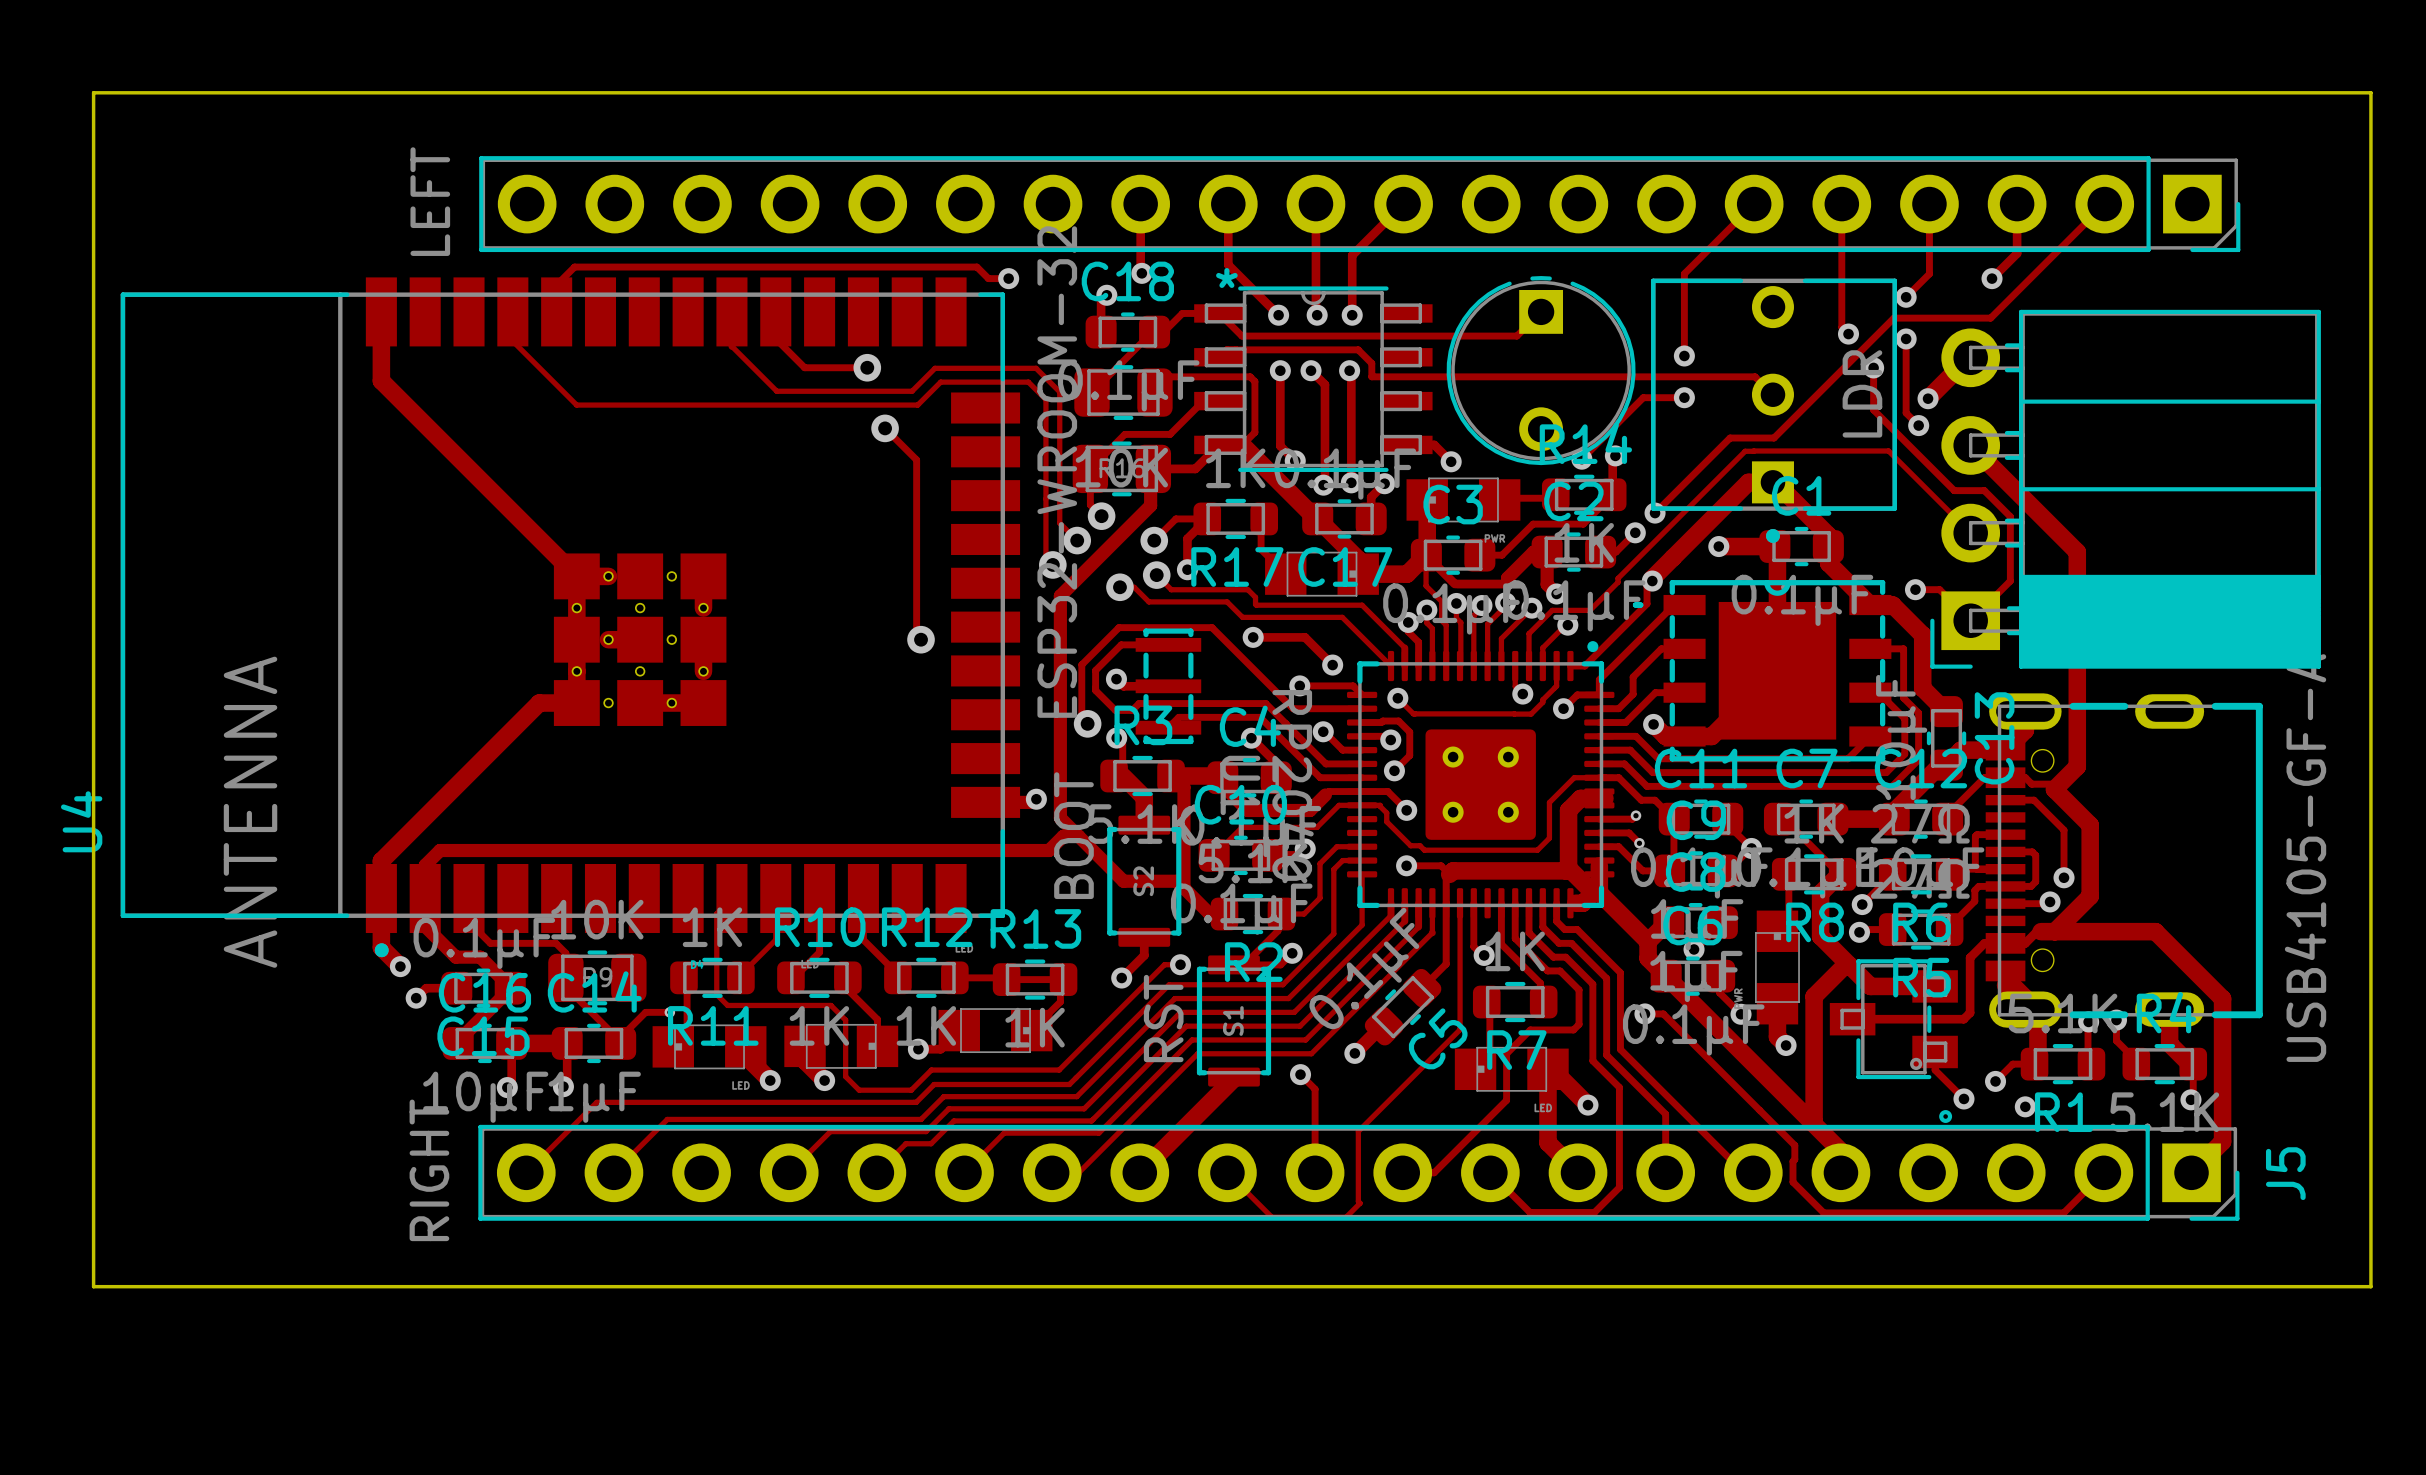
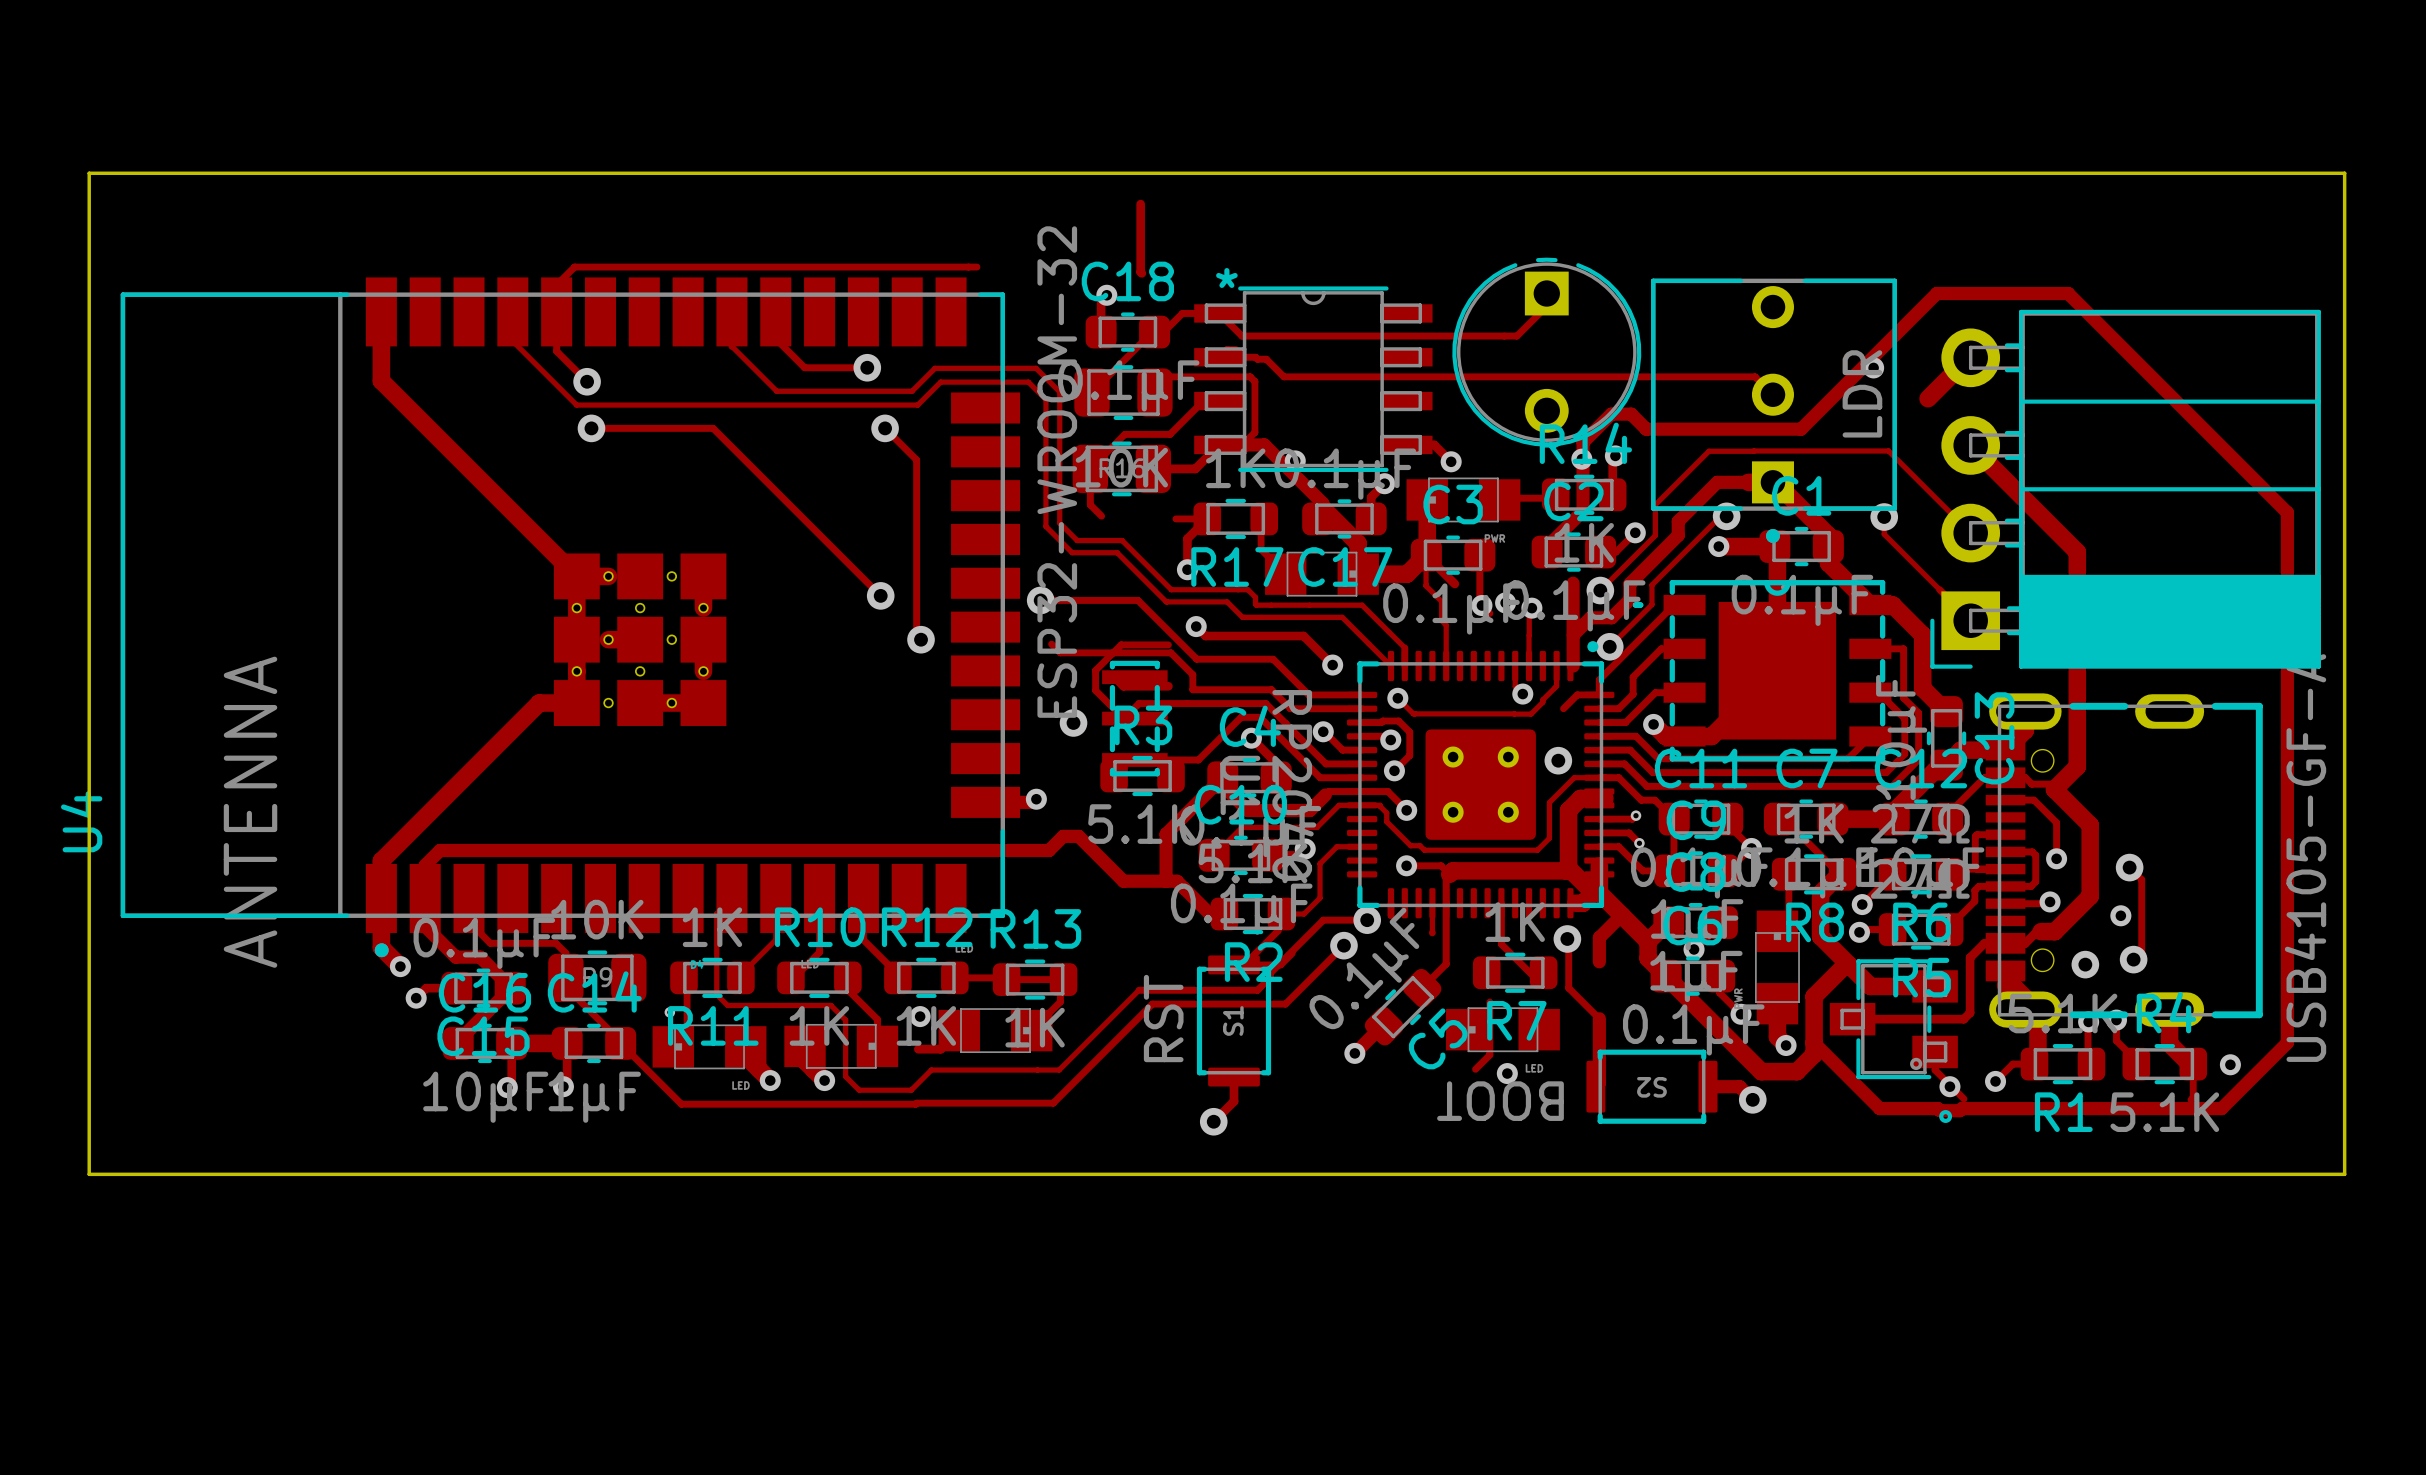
board edge: (93, 92) (93, 1286) (2370, 1286) (2370, 92) (93, 92) -> (89, 173) (89, 1174) (2344, 1174) (2344, 173) (89, 173)
track: (1228, 204) (1228, 264) (1278, 315) -> none
track: (1315, 204) (1317, 315) -> none
part: LEFT (1359, 204) -> none
track: (1403, 204) (1352, 255) (1352, 315) -> none
track: (1754, 204) (1684, 273) (1684, 355) -> none
track: (1841, 204) (1841, 327) (1848, 334) -> none
track: (1929, 204) (1929, 273) (1906, 297) -> none
track: (2017, 204) (2017, 253) (1992, 278) -> none
track: (2104, 204) (1990, 318) (1893, 318) (1774, 438) (1730, 438) (1655, 513) -> none
track: (976, 267) (988, 278) (1008, 278) -> none
via: (1141, 273) -> none
via: (1008, 278) -> none
via: (1992, 278) -> none
via: (1906, 297) -> none
track: none -> (556, 311) (556, 351) (587, 381)
via: (1278, 315) -> none
via: (1317, 315) -> none
via: (1352, 315) -> none
via: (1848, 334) -> none
track: (1906, 338) (1906, 413) (1918, 425) -> none
via: (1906, 338) -> none
track: (1236, 349) (1358, 349) (1371, 363) (1371, 376) -> (1219, 357) (1255, 357) (1257, 359) (1266, 359) (1283, 376) (1371, 376)
via: (1684, 355) -> none
track: (1873, 367) (1873, 409) (1954, 490) (1984, 490) (2010, 516) (2010, 581) (1970, 620) -> (1884, 517) (1884, 534) (1970, 620)
track: (1280, 370) (1280, 446) (1295, 460) -> none
via: (1280, 370) -> none
track: (1311, 370) (1324, 384) (1323, 485) -> none
via: (1311, 370) -> none
track: (1349, 370) (1351, 372) (1351, 482) -> none
via: (1349, 370) -> none
part position: (1541, 370) -> (1546, 352)
via: none -> (587, 381)
track: (1684, 397) (1643, 397) (1581, 459) -> none
via: (1684, 397) -> none
via: (1928, 398) -> none
via: (1918, 425) -> none
track: none -> (591, 428) (713, 428) (880, 595)
via: none -> (591, 428)
track: (1242, 444) (1358, 559) -> (1219, 444) (1264, 444) (1322, 503) (1322, 508) (1358, 543) (1358, 559)
track: (1745, 451) (1618, 578) (1618, 582) (1589, 610) (1552, 610) (1529, 635) -> (1745, 451) (1708, 451) (1655, 504) (1655, 535) (1600, 590)
track: (1150, 471) (1150, 505) (1060, 595) (1060, 818) (1078, 836) -> none
via: (1351, 482) -> none
track: (1748, 482) (1652, 578) (1647, 586) (1647, 603) (1584, 666) (1570, 666) -> (1748, 482) (1717, 482) (1678, 521) (1678, 535) (1629, 583) (1629, 599) (1611, 617) (1590, 617) (1573, 635)
via: (1323, 485) -> none
track: (1612, 486) (1612, 494) (1583, 524) (1533, 524) (1502, 555) (1479, 555) -> none
via: (1655, 513) -> none
via: (1101, 516) -> none
track: none -> (1726, 516) (1720, 516) (1651, 585) (1651, 604) (1609, 646)
via: none -> (1726, 516)
via: none -> (1884, 517)
track: (1175, 518) (1154, 540) -> none
track: (1045, 526) (1045, 558) (1052, 564) -> none
track: none -> (1077, 540) (1122, 540) (1156, 575)
via: (1077, 540) -> none
via: (1154, 540) -> none
track: none -> (1541, 552) (1583, 510) (1583, 442) (1611, 414) (1631, 414) (1646, 429) (1801, 429) (1936, 293) (2068, 293) (2287, 512) (2287, 1042) (2221, 1108) (1961, 1108) (1959, 1110) (1940, 1110) (1937, 1108) (1879, 1108) (1814, 1042)
via: (1052, 564) -> none
track: none -> (1479, 565) (1479, 603) (1489, 613)
via: (1156, 575) -> none
track: (1507, 578) (1533, 552) (1547, 552) (1547, 584) (1556, 593) -> none
via: (1652, 581) -> none
track: none -> (1573, 583) (1573, 666)
track: (1457, 584) (1507, 584) -> none
track: (1119, 587) (1134, 587) (1148, 601) (1166, 601) -> (1045, 526) (1072, 552) (1117, 552) (1166, 601)
via: (1119, 587) -> none
track: (1915, 589) (1939, 589) -> none
via: (1915, 589) -> none
via: none -> (1600, 590)
via: (1556, 593) -> none
via: none -> (880, 595)
via: none -> (1040, 600)
track: (1505, 602) (1505, 606) (1487, 624) (1487, 666) -> none
track: (1456, 603) (1456, 618) (1460, 622) (1460, 665) -> none
via: (1456, 603) -> none
track: (1481, 605) (1473, 615) (1473, 666) -> none
track: (1531, 608) (1501, 638) (1501, 666) -> none
track: (1426, 610) (1426, 623) (1432, 628) (1432, 666) -> none
via: (1426, 610) -> none
track: none -> (1529, 613) (1529, 635)
track: (1408, 622) (1408, 631) (1418, 642) (1418, 666) -> none
via: (1408, 622) -> none
track: (1567, 625) (1565, 625) (1542, 647) (1542, 666) -> none
via: (1567, 625) -> none
via: none -> (1196, 626)
track: (1253, 637) (1305, 637) -> (1196, 626) (1205, 636) (1305, 637)
via: (1253, 637) -> none
via: none -> (1609, 646)
via: (1116, 679) -> none
track: (1299, 685) (1353, 685) (1362, 694) -> (1040, 600) (1138, 600) (1196, 659) (1273, 659) (1308, 694) (1362, 694)
via: (1299, 685) -> none
part position: (1168, 686) -> (1134, 718)
track: (1293, 708) (1212, 627) (1118, 627) (1081, 664) (1081, 718) (1087, 723) -> (1293, 708) (1290, 708) (1271, 689) (1192, 689) (1192, 674) (1170, 652) (1060, 652) (1051, 644)
via: (1563, 708) -> none
track: (1241, 717) (1178, 717) (1168, 727) -> (1241, 717) (1198, 759) (1134, 759)
via position: (1087, 723) -> (1073, 722)
track: (1116, 738) (1122, 744) (1122, 776) (1144, 797) (1144, 825) -> none
via: (1116, 738) -> none
via: none -> (1558, 760)
track: (1220, 776) (1172, 776) (1183, 787) (1183, 888) -> none
track: none -> (1222, 777) (1166, 834) (1166, 881)
track: (2056, 822) (2064, 830) (2064, 877) -> (2056, 822) (2056, 858)
S2 value position: BOOT (1073, 835) -> BOOT (1500, 1101)
track: (1362, 860) (1342, 860) (1333, 869) (1333, 933) (1282, 984) (1169, 984) (1069, 1084) (934, 1084) (916, 1102) (596, 1102) (526, 1172) -> none
track: none -> (2129, 867) (2141, 879) (2141, 951) (2133, 959)
via: none -> (2129, 867)
track: (1362, 874) (1362, 925) (1288, 998) (1174, 998) (1076, 1096) (943, 1096) (921, 1119) (667, 1119) (613, 1172) -> none
via position: (2064, 877) -> (2056, 858)
S2 rotation: 0° (1144, 881) -> 90° clockwise (1651, 1086)
S2 position: (1144, 881) -> (1651, 1086)
track: (1404, 903) (1404, 921) (1300, 1026) (1186, 1026) (1091, 1120) (953, 1120) (931, 1143) (905, 1143) (876, 1172) -> none
track: (1418, 903) (1418, 927) (1305, 1039) (1192, 1039) (1098, 1133) (1004, 1133) (964, 1172) -> none
track: (1460, 903) (1460, 1029) (1358, 1131) (1358, 1201) (1360, 1203) (1346, 1217) (1271, 1217) (1227, 1172) -> none
track: (1473, 903) (1473, 946) (1484, 955) -> none
track: (1515, 903) (1515, 938) (1547, 970) (1560, 970) (1579, 989) (1579, 1024) (1573, 1029) (1530, 1029) (1506, 1053) (1506, 1100) (1434, 1172) (1402, 1172) -> none
track: (1529, 903) (1529, 932) (1553, 957) (1565, 957) (1592, 984) (1592, 1060) (1619, 1087) (1619, 1187) (1594, 1212) (1530, 1212) (1490, 1172) -> none
track: (1542, 903) (1542, 927) (1559, 943) (1571, 943) (1606, 978) (1606, 1055) (1665, 1114) (1665, 1172) -> none
track: (1556, 903) (1556, 921) (1564, 929) (1577, 929) (1620, 972) (1620, 1049) (1743, 1172) (1753, 1172) -> none
track: (1391, 915) (1294, 1012) (1180, 1012) (1084, 1108) (948, 1108) (926, 1131) (830, 1131) (789, 1172) -> none
track: none -> (1621, 915) (1599, 937) (1599, 961)
via: none -> (2120, 915)
via: none -> (1367, 920)
track: (2054, 931) (2155, 931) (2222, 998) (2222, 1141) (2191, 1172) -> none
track: (1432, 932) (1311, 1053) (1197, 1053) (1078, 1172) (1052, 1172) -> none
track: none -> (1567, 938) (1568, 988) (1599, 1018) (1599, 1083) (1595, 1086)
via: none -> (1567, 938)
track: (1147, 940) (1144, 937) (1144, 955) (1121, 978) -> none
track: none -> (1343, 945) (1285, 1004) (1152, 1004) (1053, 1103) (681, 1104) (620, 1043)
via: none -> (1343, 945)
via: (1292, 953) -> none
via: (1484, 955) -> none
via: none -> (2133, 959)
track: (1180, 964) (1164, 964) (1138, 990) -> (1367, 920) (1323, 920) (1270, 973) (1270, 977) (1257, 990) (1138, 990)
via: (1180, 964) -> none
via: none -> (2085, 964)
via: (1121, 978) -> none
R7 position: (1515, 1002) -> (1515, 972)
track: (669, 1012) (645, 1012) (622, 1035) -> none
track: (1644, 1013) (1663, 1013) (1794, 1145) (1792, 1182) (1823, 1212) (2063, 1212) (2103, 1172) -> none
via: (1644, 1013) -> none
via position: (918, 1049) -> (920, 1016)
track: (1814, 1054) (1812, 1123) -> (1814, 1054) (1796, 1071) (1761, 1071)
part position: (1511, 1069) -> (1502, 1029)
via: none -> (1507, 1073)
track: (1300, 1074) (1315, 1089) (1315, 1172) -> none
via: (1300, 1074) -> none
track: none -> (1234, 1077) (1234, 1101) (1213, 1121)
track: (1234, 1078) (1139, 1172) -> none
track: none -> (1708, 1086) (1739, 1086) (1752, 1099)
via position: (1963, 1098) -> (1949, 1086)
via: none -> (1752, 1099)
via position: (2190, 1099) -> (2230, 1064)
track: (1587, 1105) (1552, 1069) (1548, 1069) (1548, 1142) (1578, 1172) -> none
via: (1587, 1105) -> none
via: (2025, 1106) -> none
via: none -> (1213, 1121)
J5: RIGHT (1358, 1172) -> none

